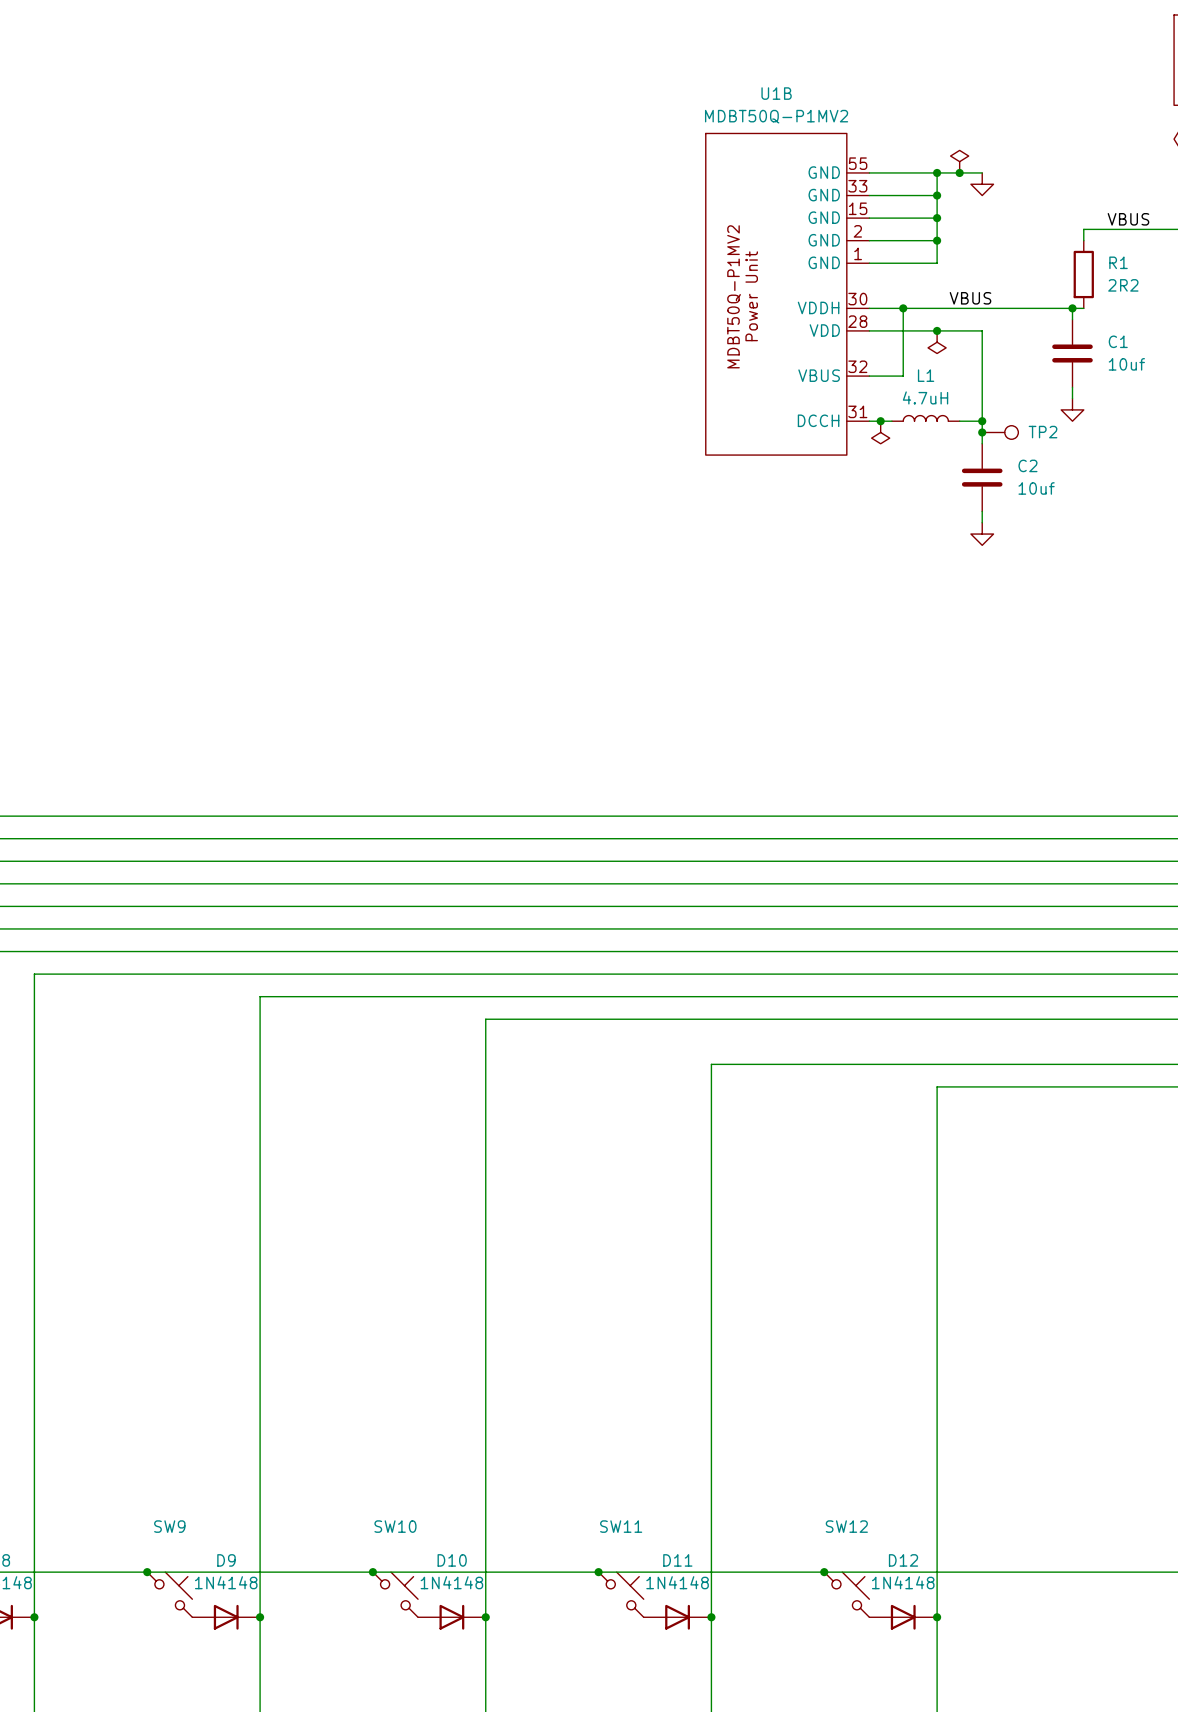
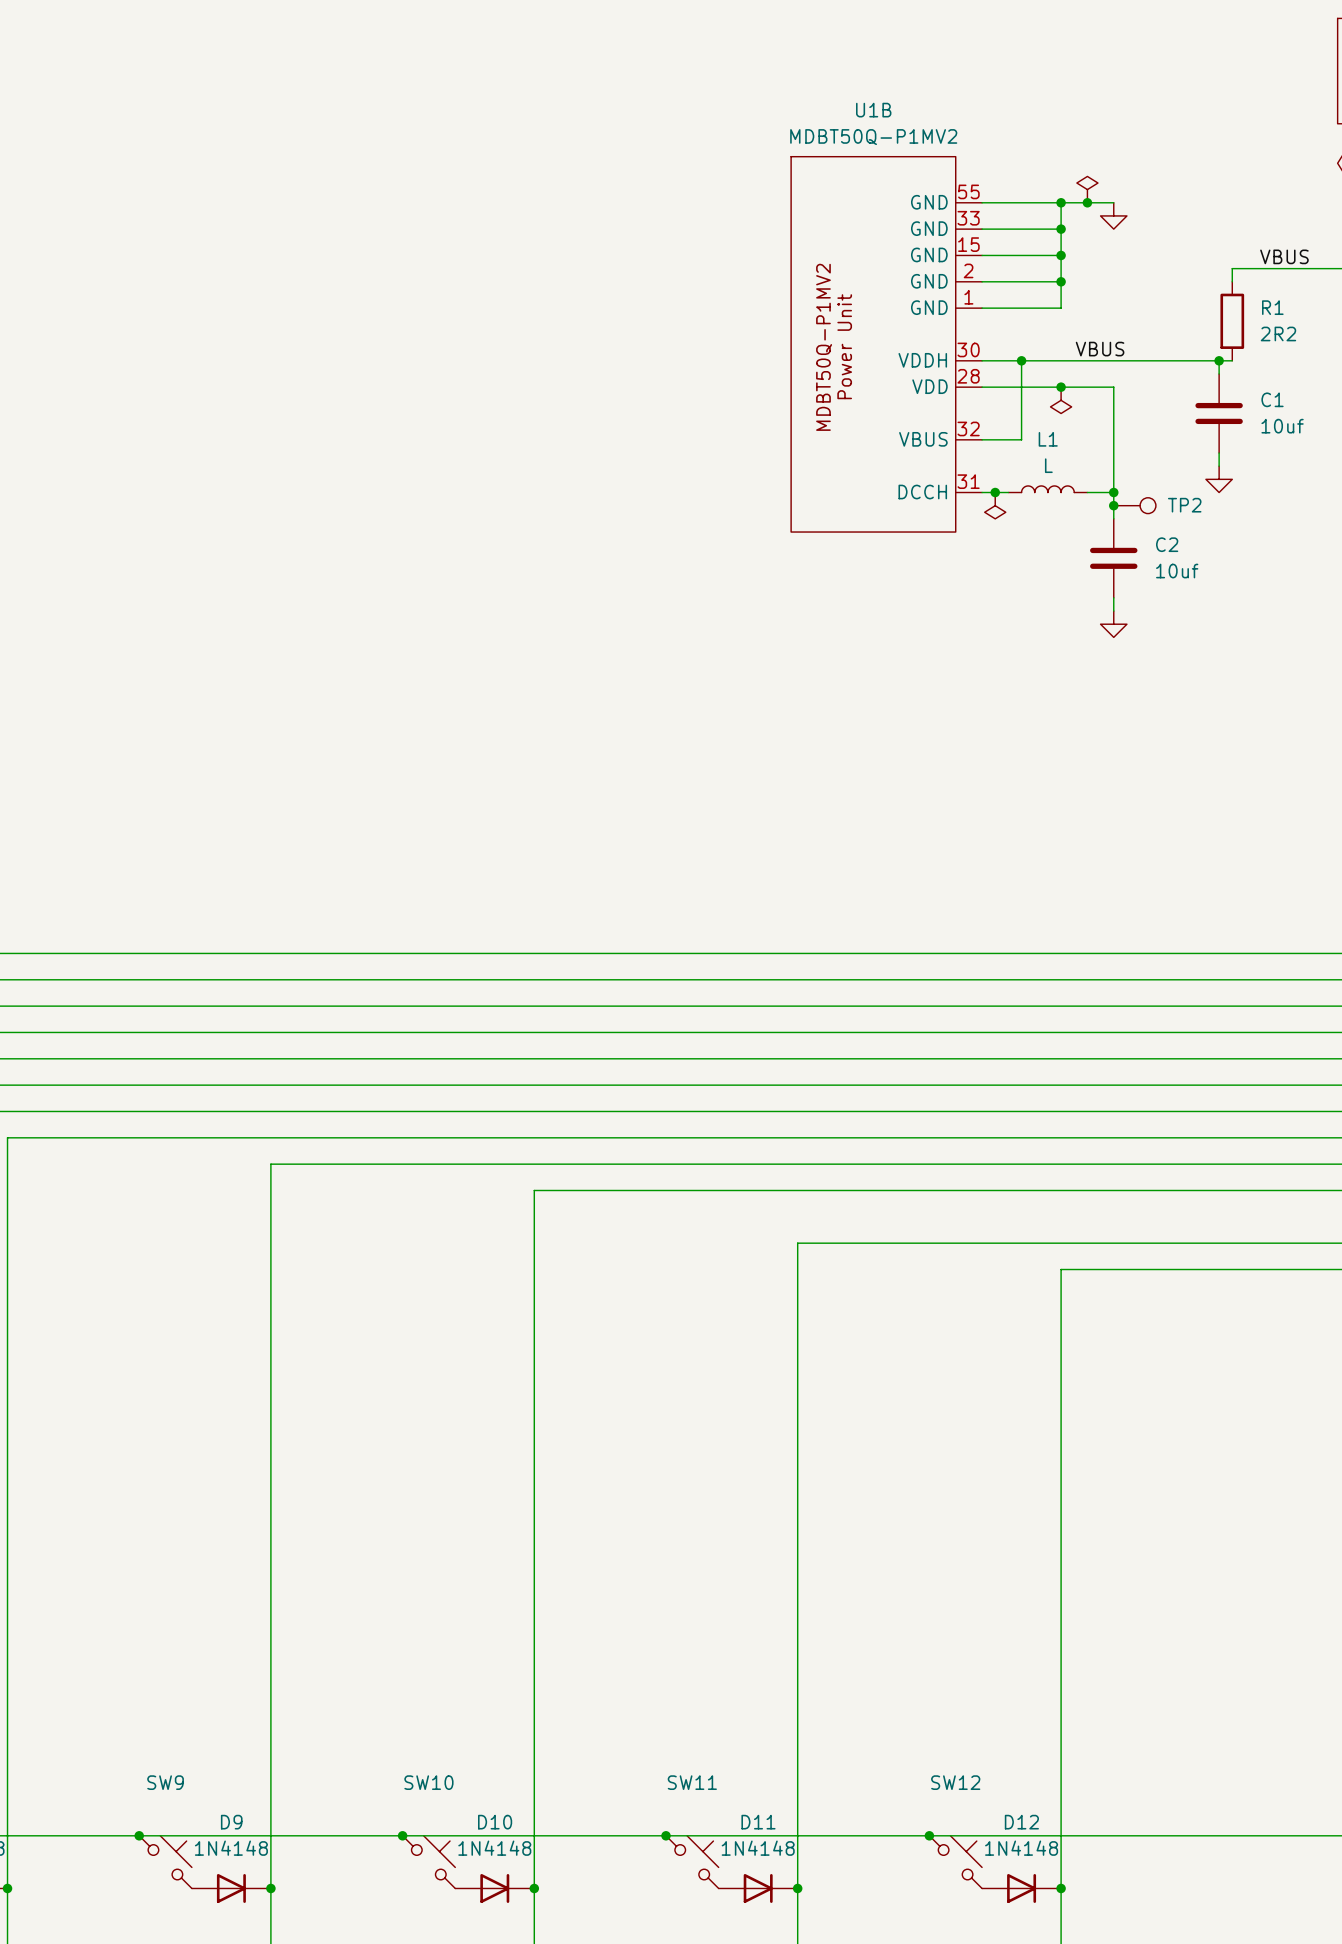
L1 value: 4.7uH (925, 397) -> L (1048, 465)

